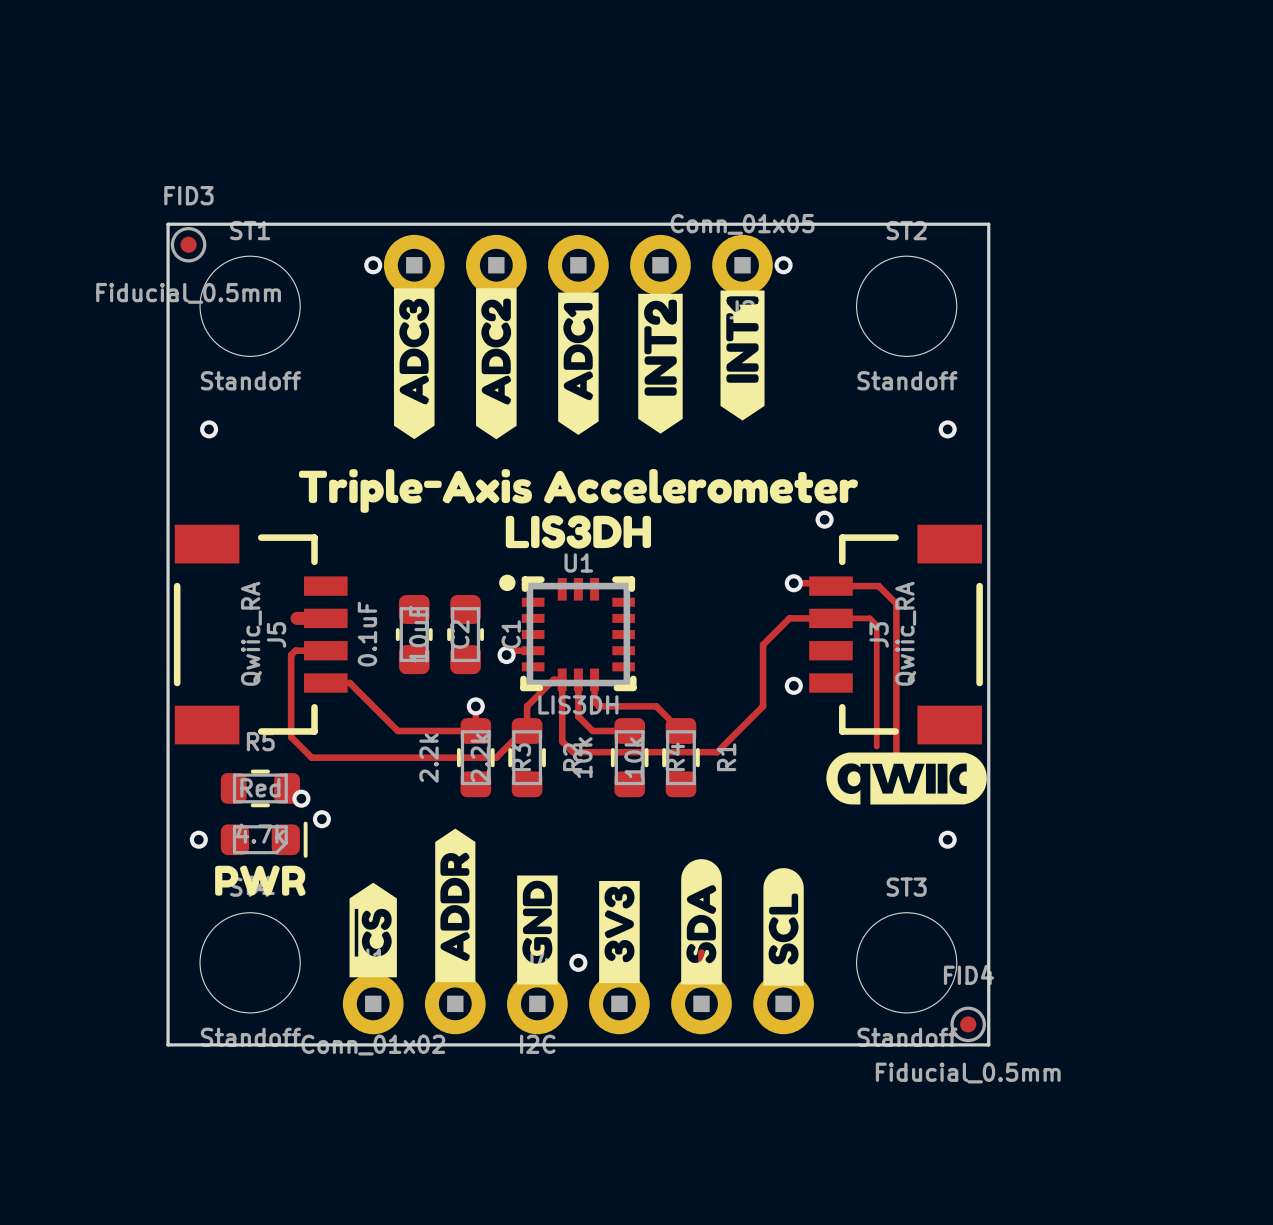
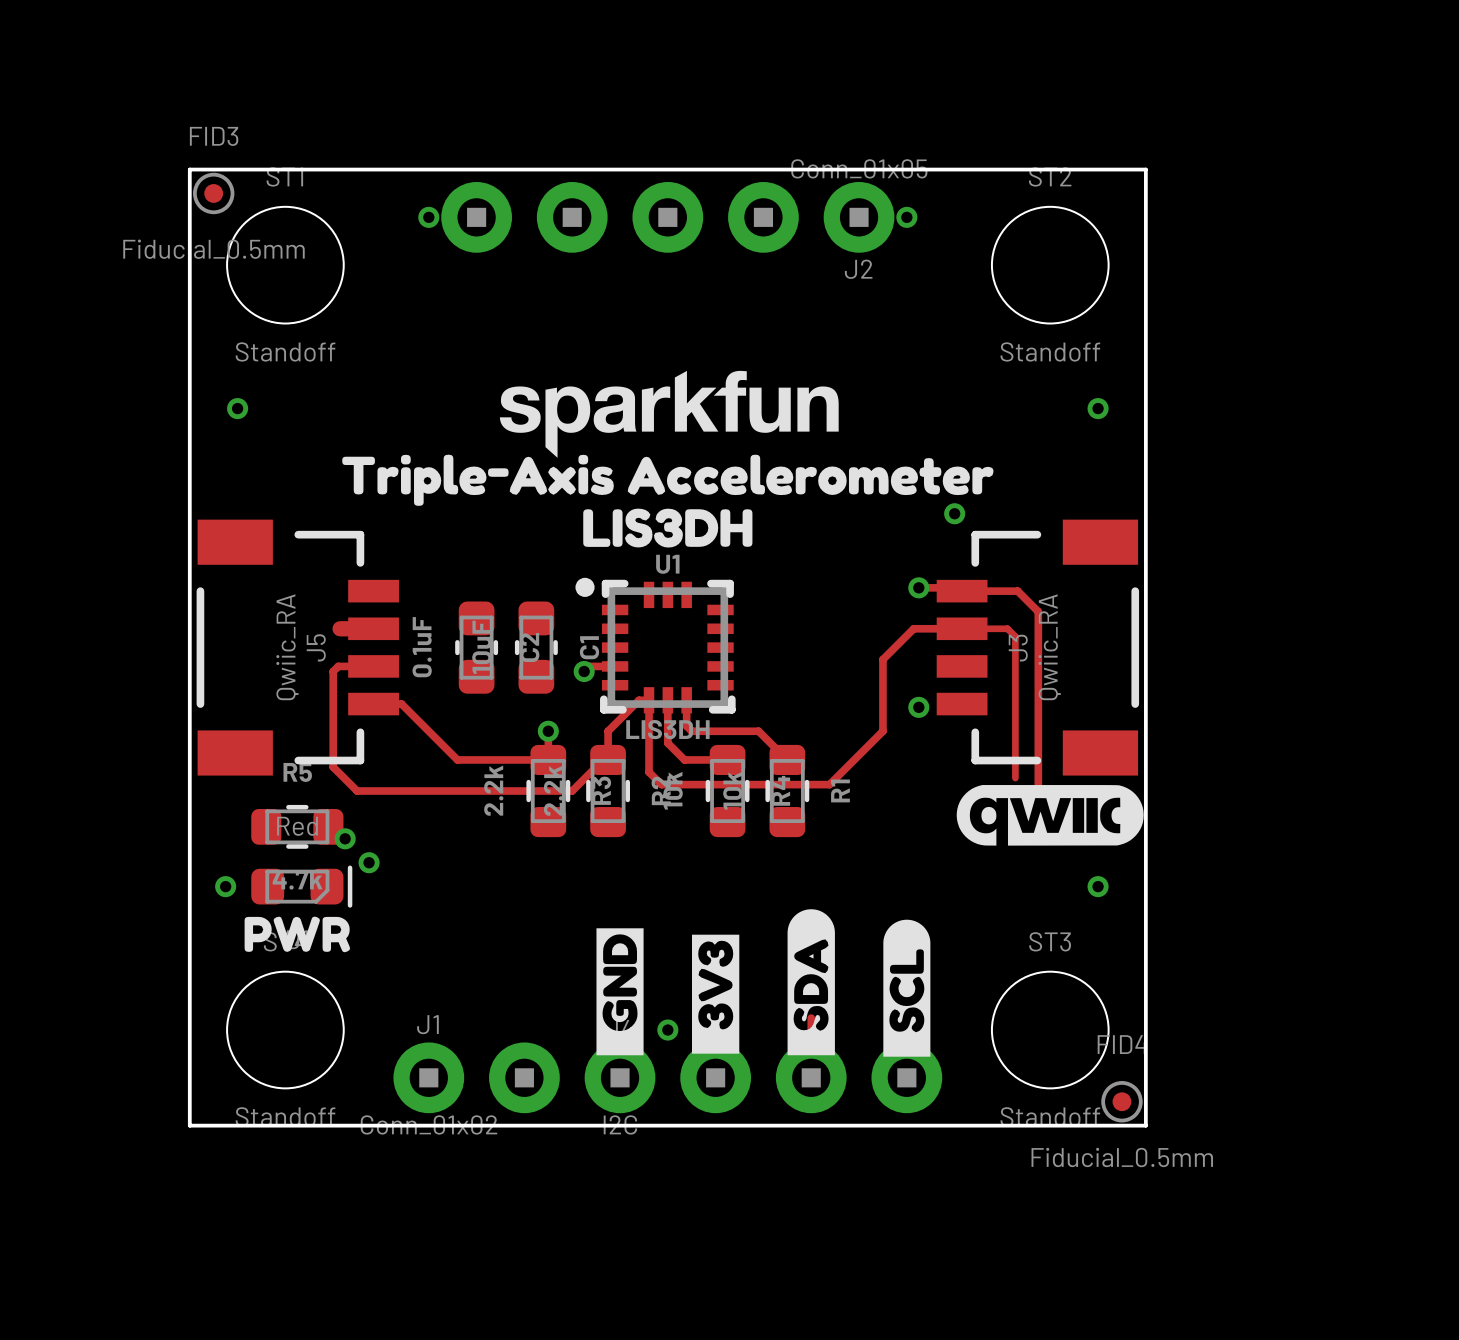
drawing: [393, 288, 435, 440] -> none
drawing: [476, 288, 517, 440] -> none
drawing: [638, 290, 765, 434] -> none
drawing: [558, 292, 599, 435] -> none
drawing: none -> [499, 370, 839, 458]
drawing: [349, 828, 476, 983] -> none

